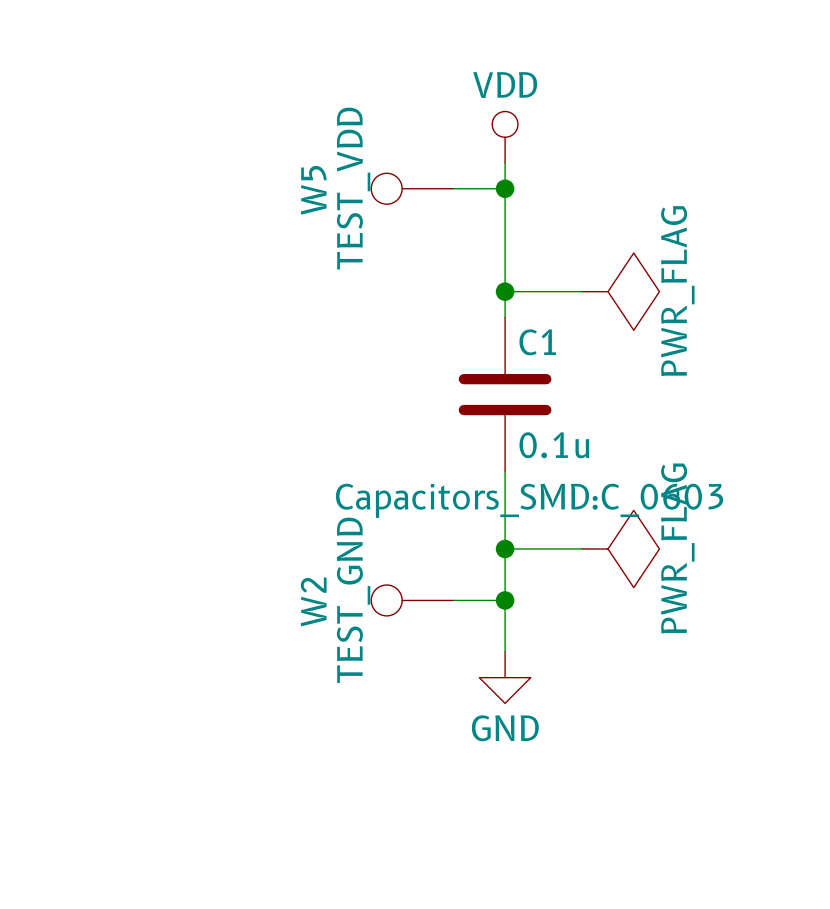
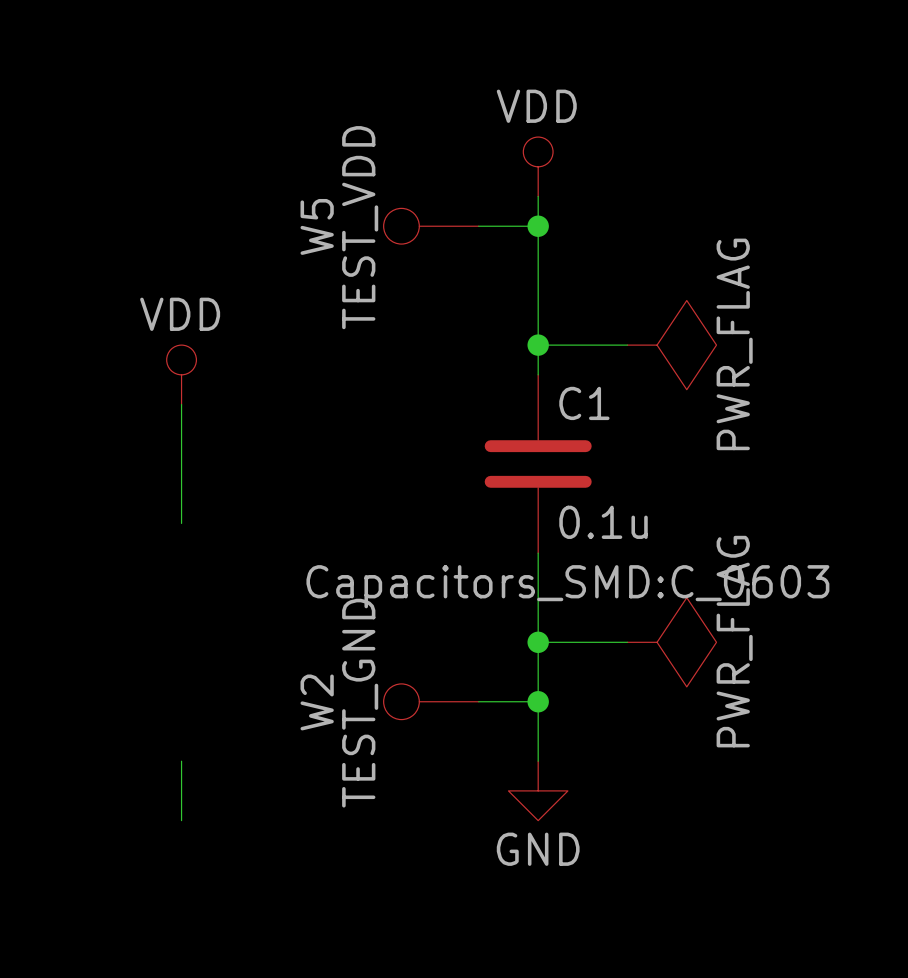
power symbol: none -> VDD (181, 374)
wire: none -> (181, 404) (181, 523)
wire: none -> (181, 761) (181, 820)

